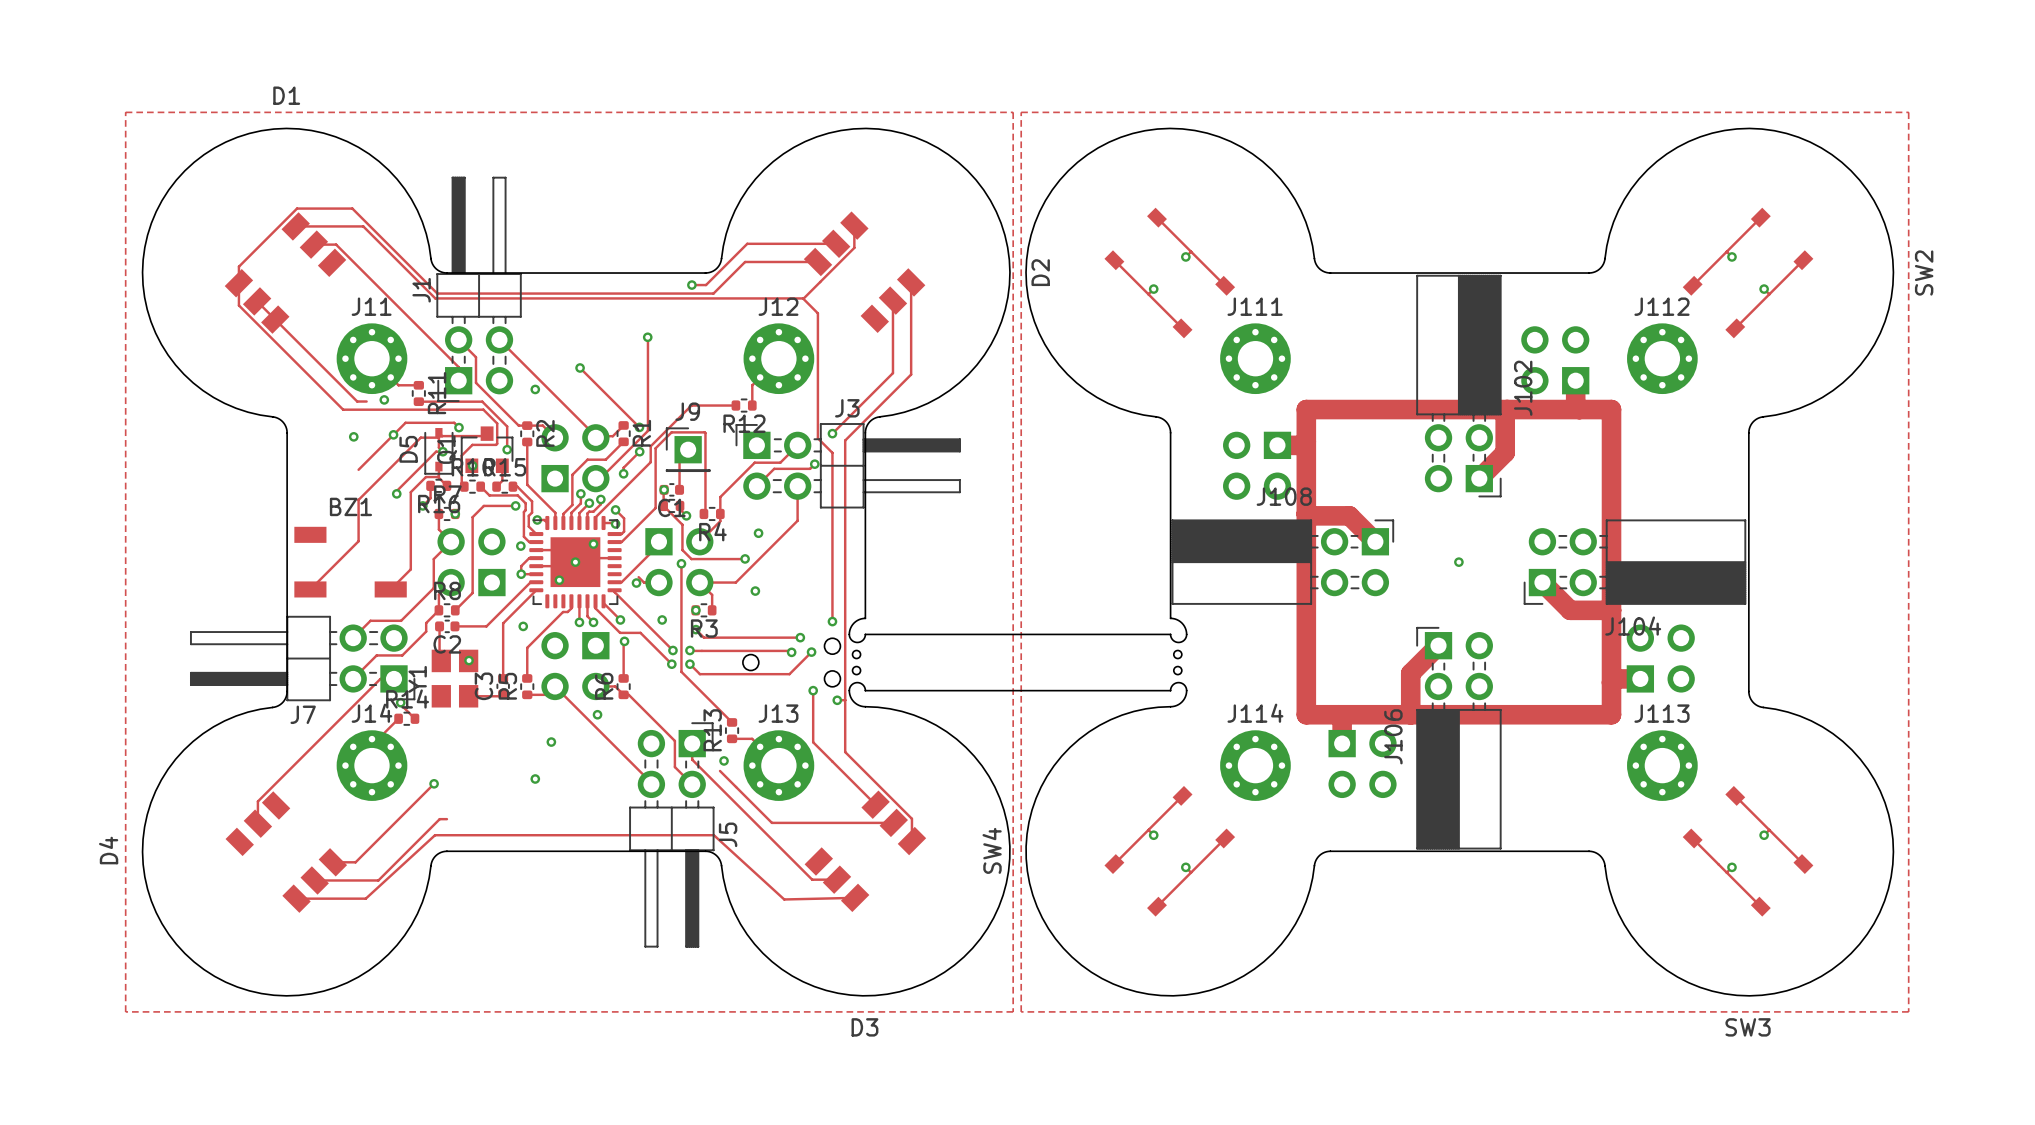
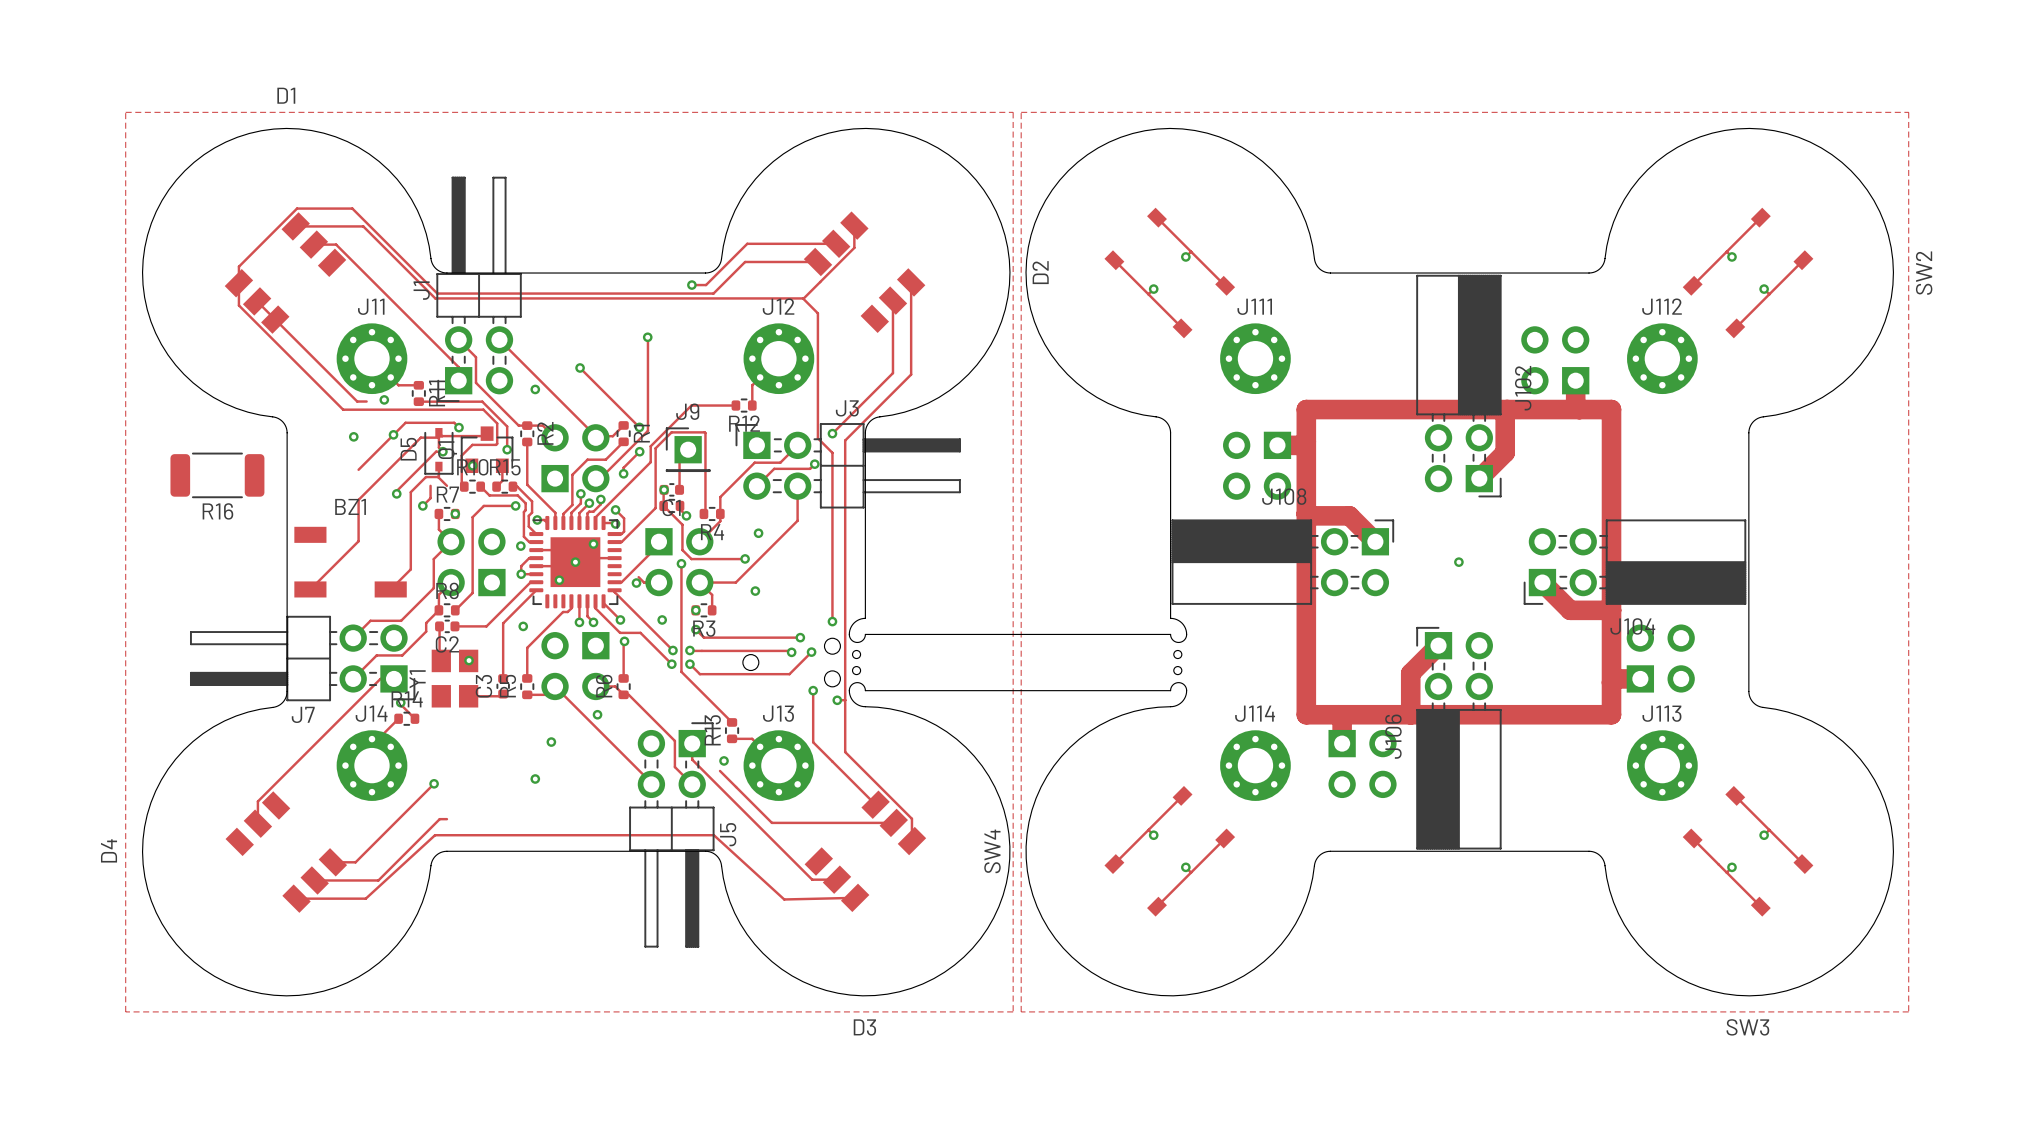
R16 footprint: [426, 478, 452, 493] -> [170, 452, 265, 499]

